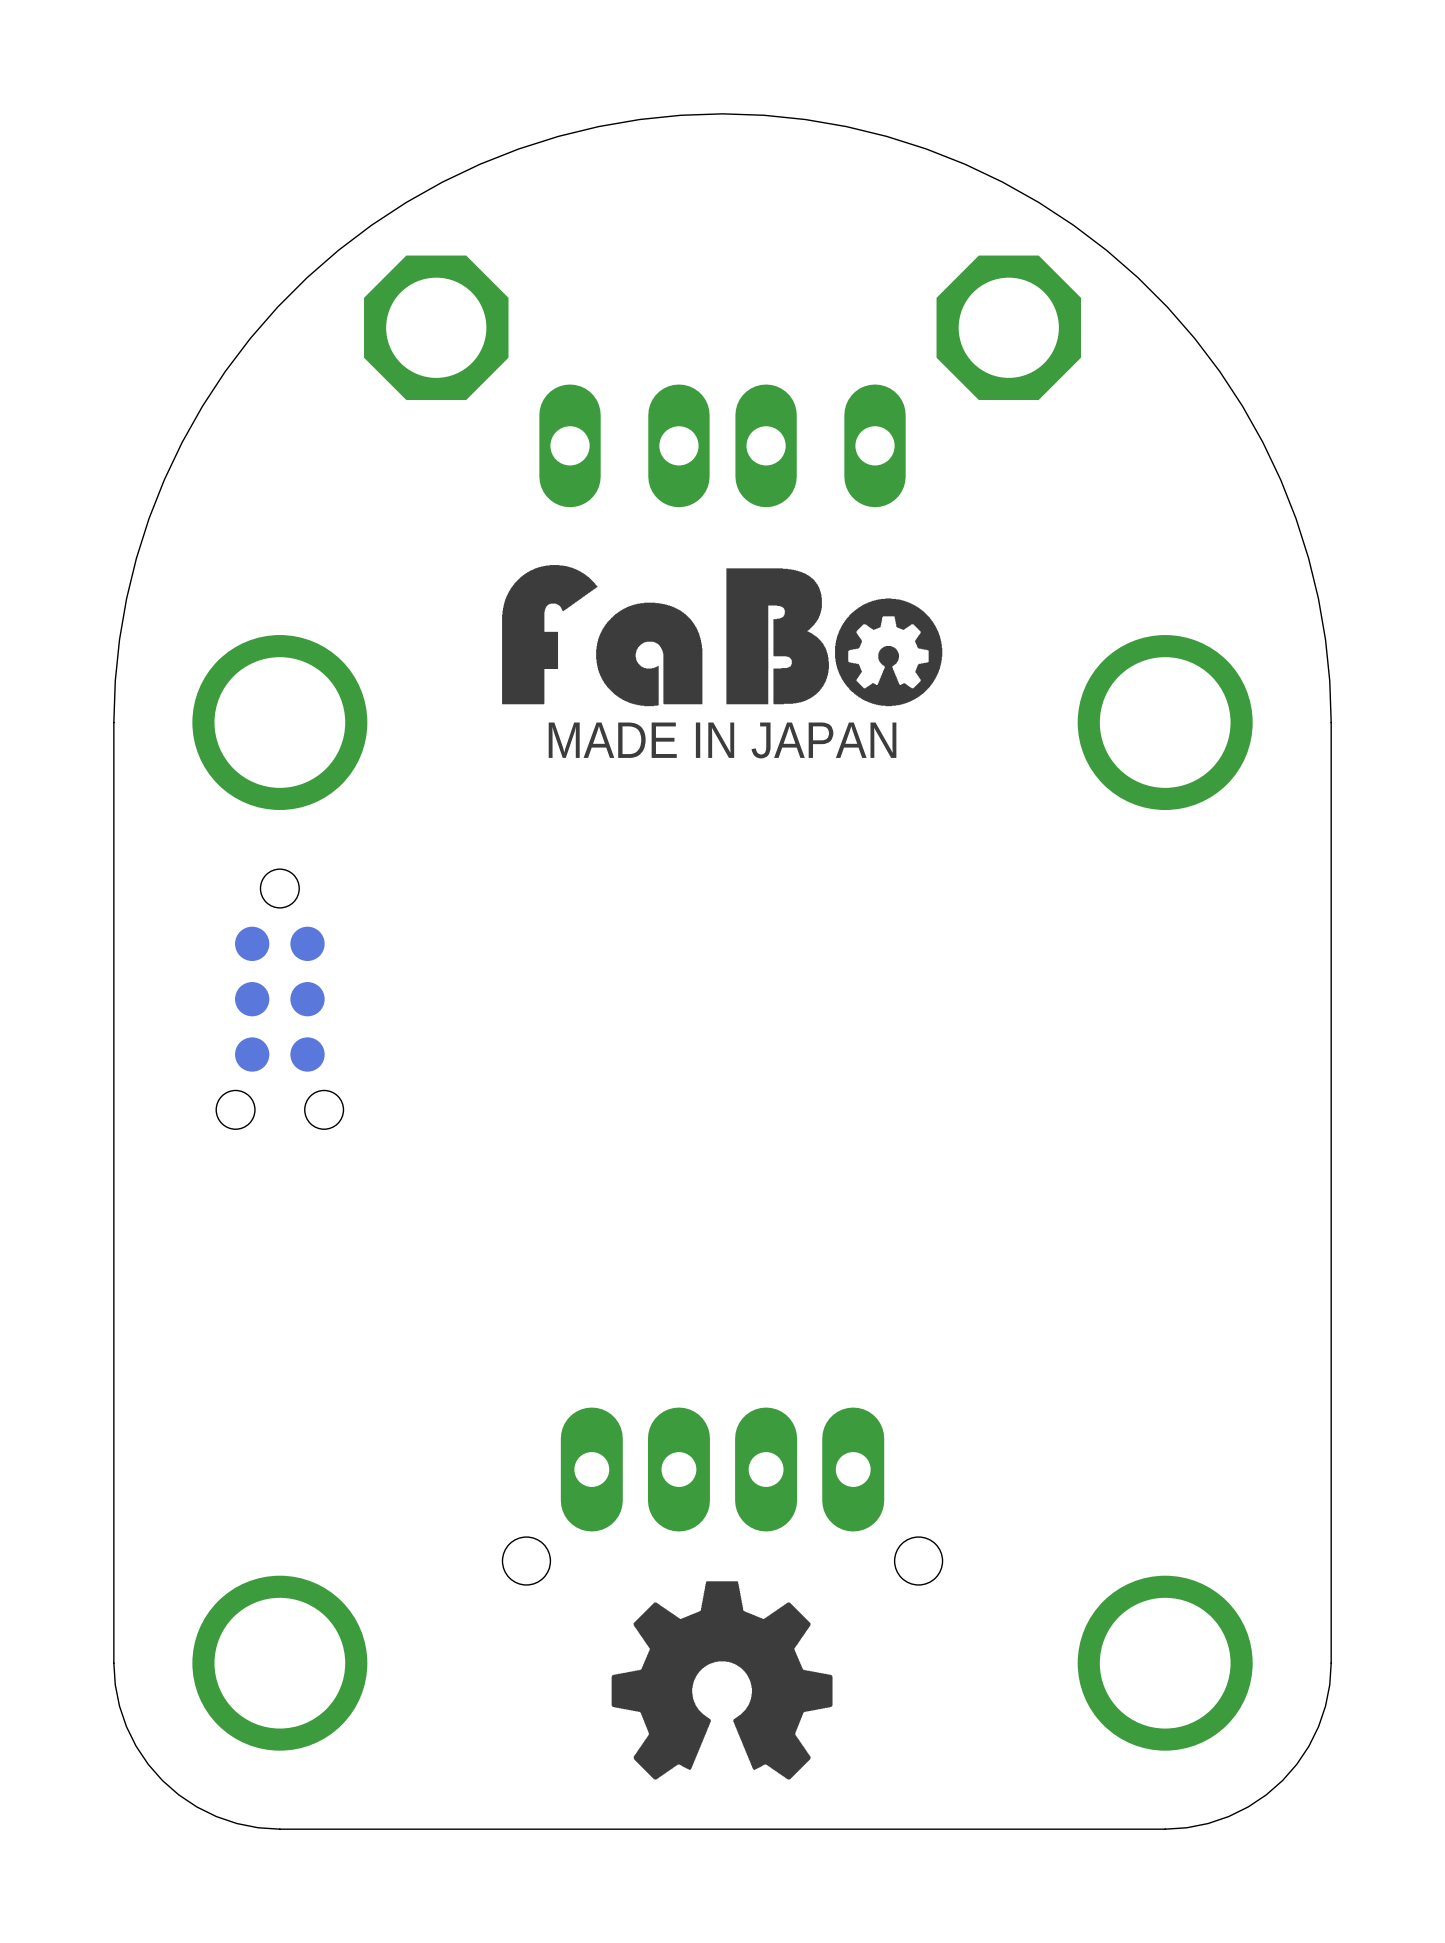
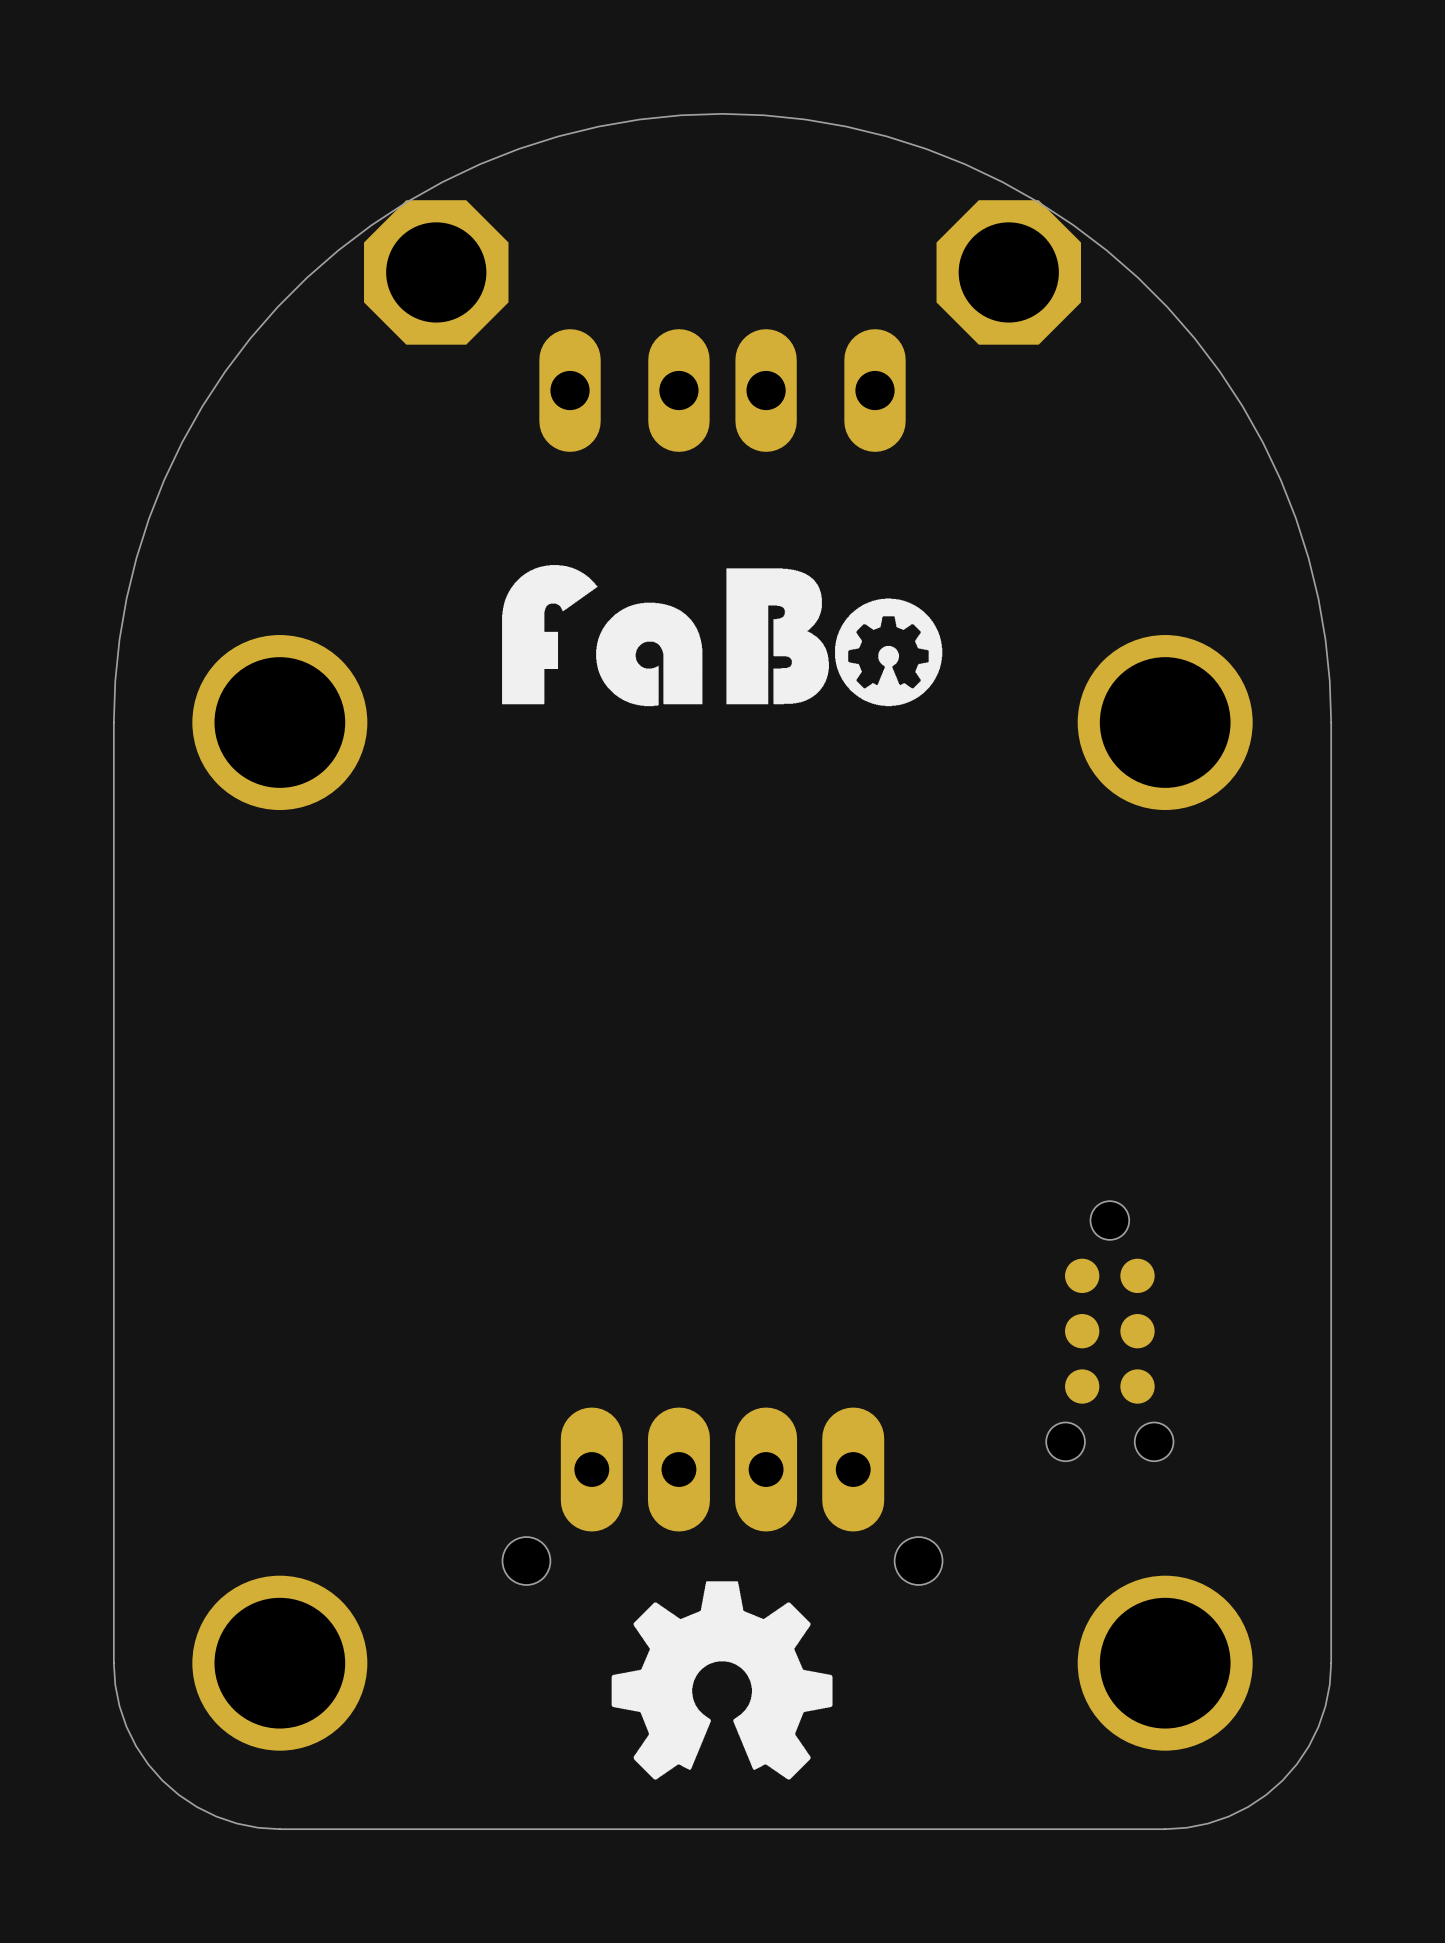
part position: (722, 381) -> (722, 326)
text: MADE IN JAPAN (722, 740) -> none
part position: (279, 999) -> (1109, 1331)

